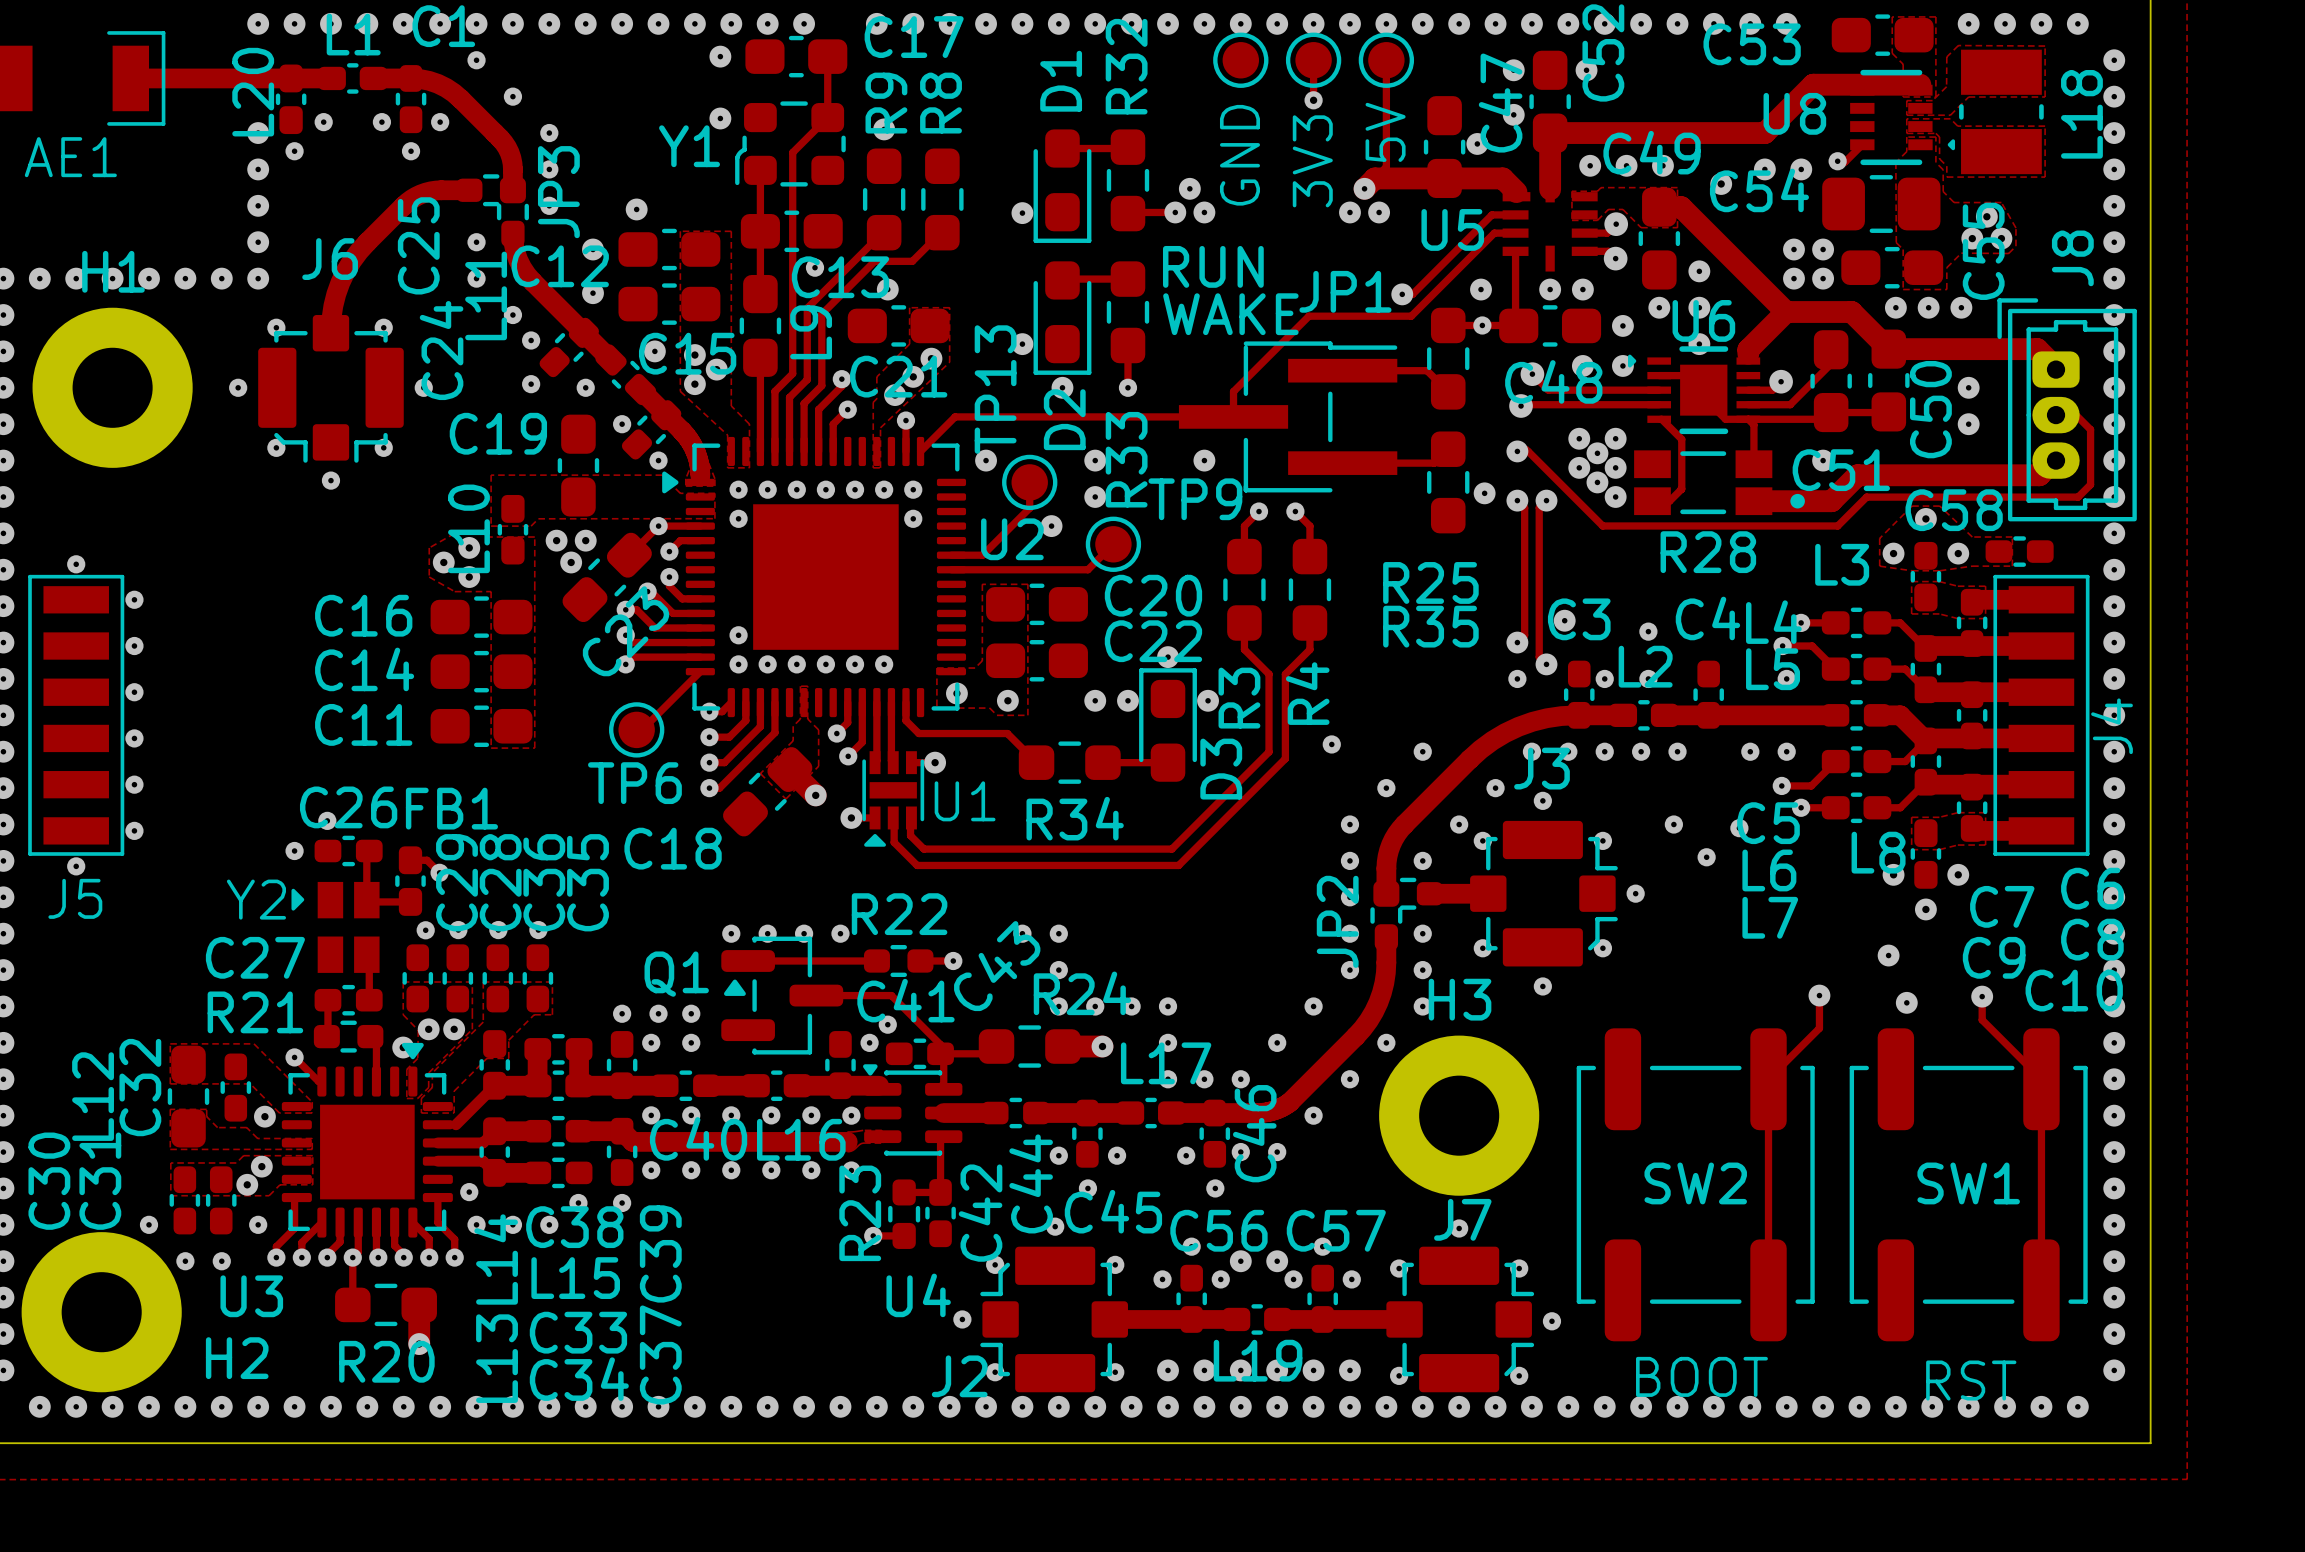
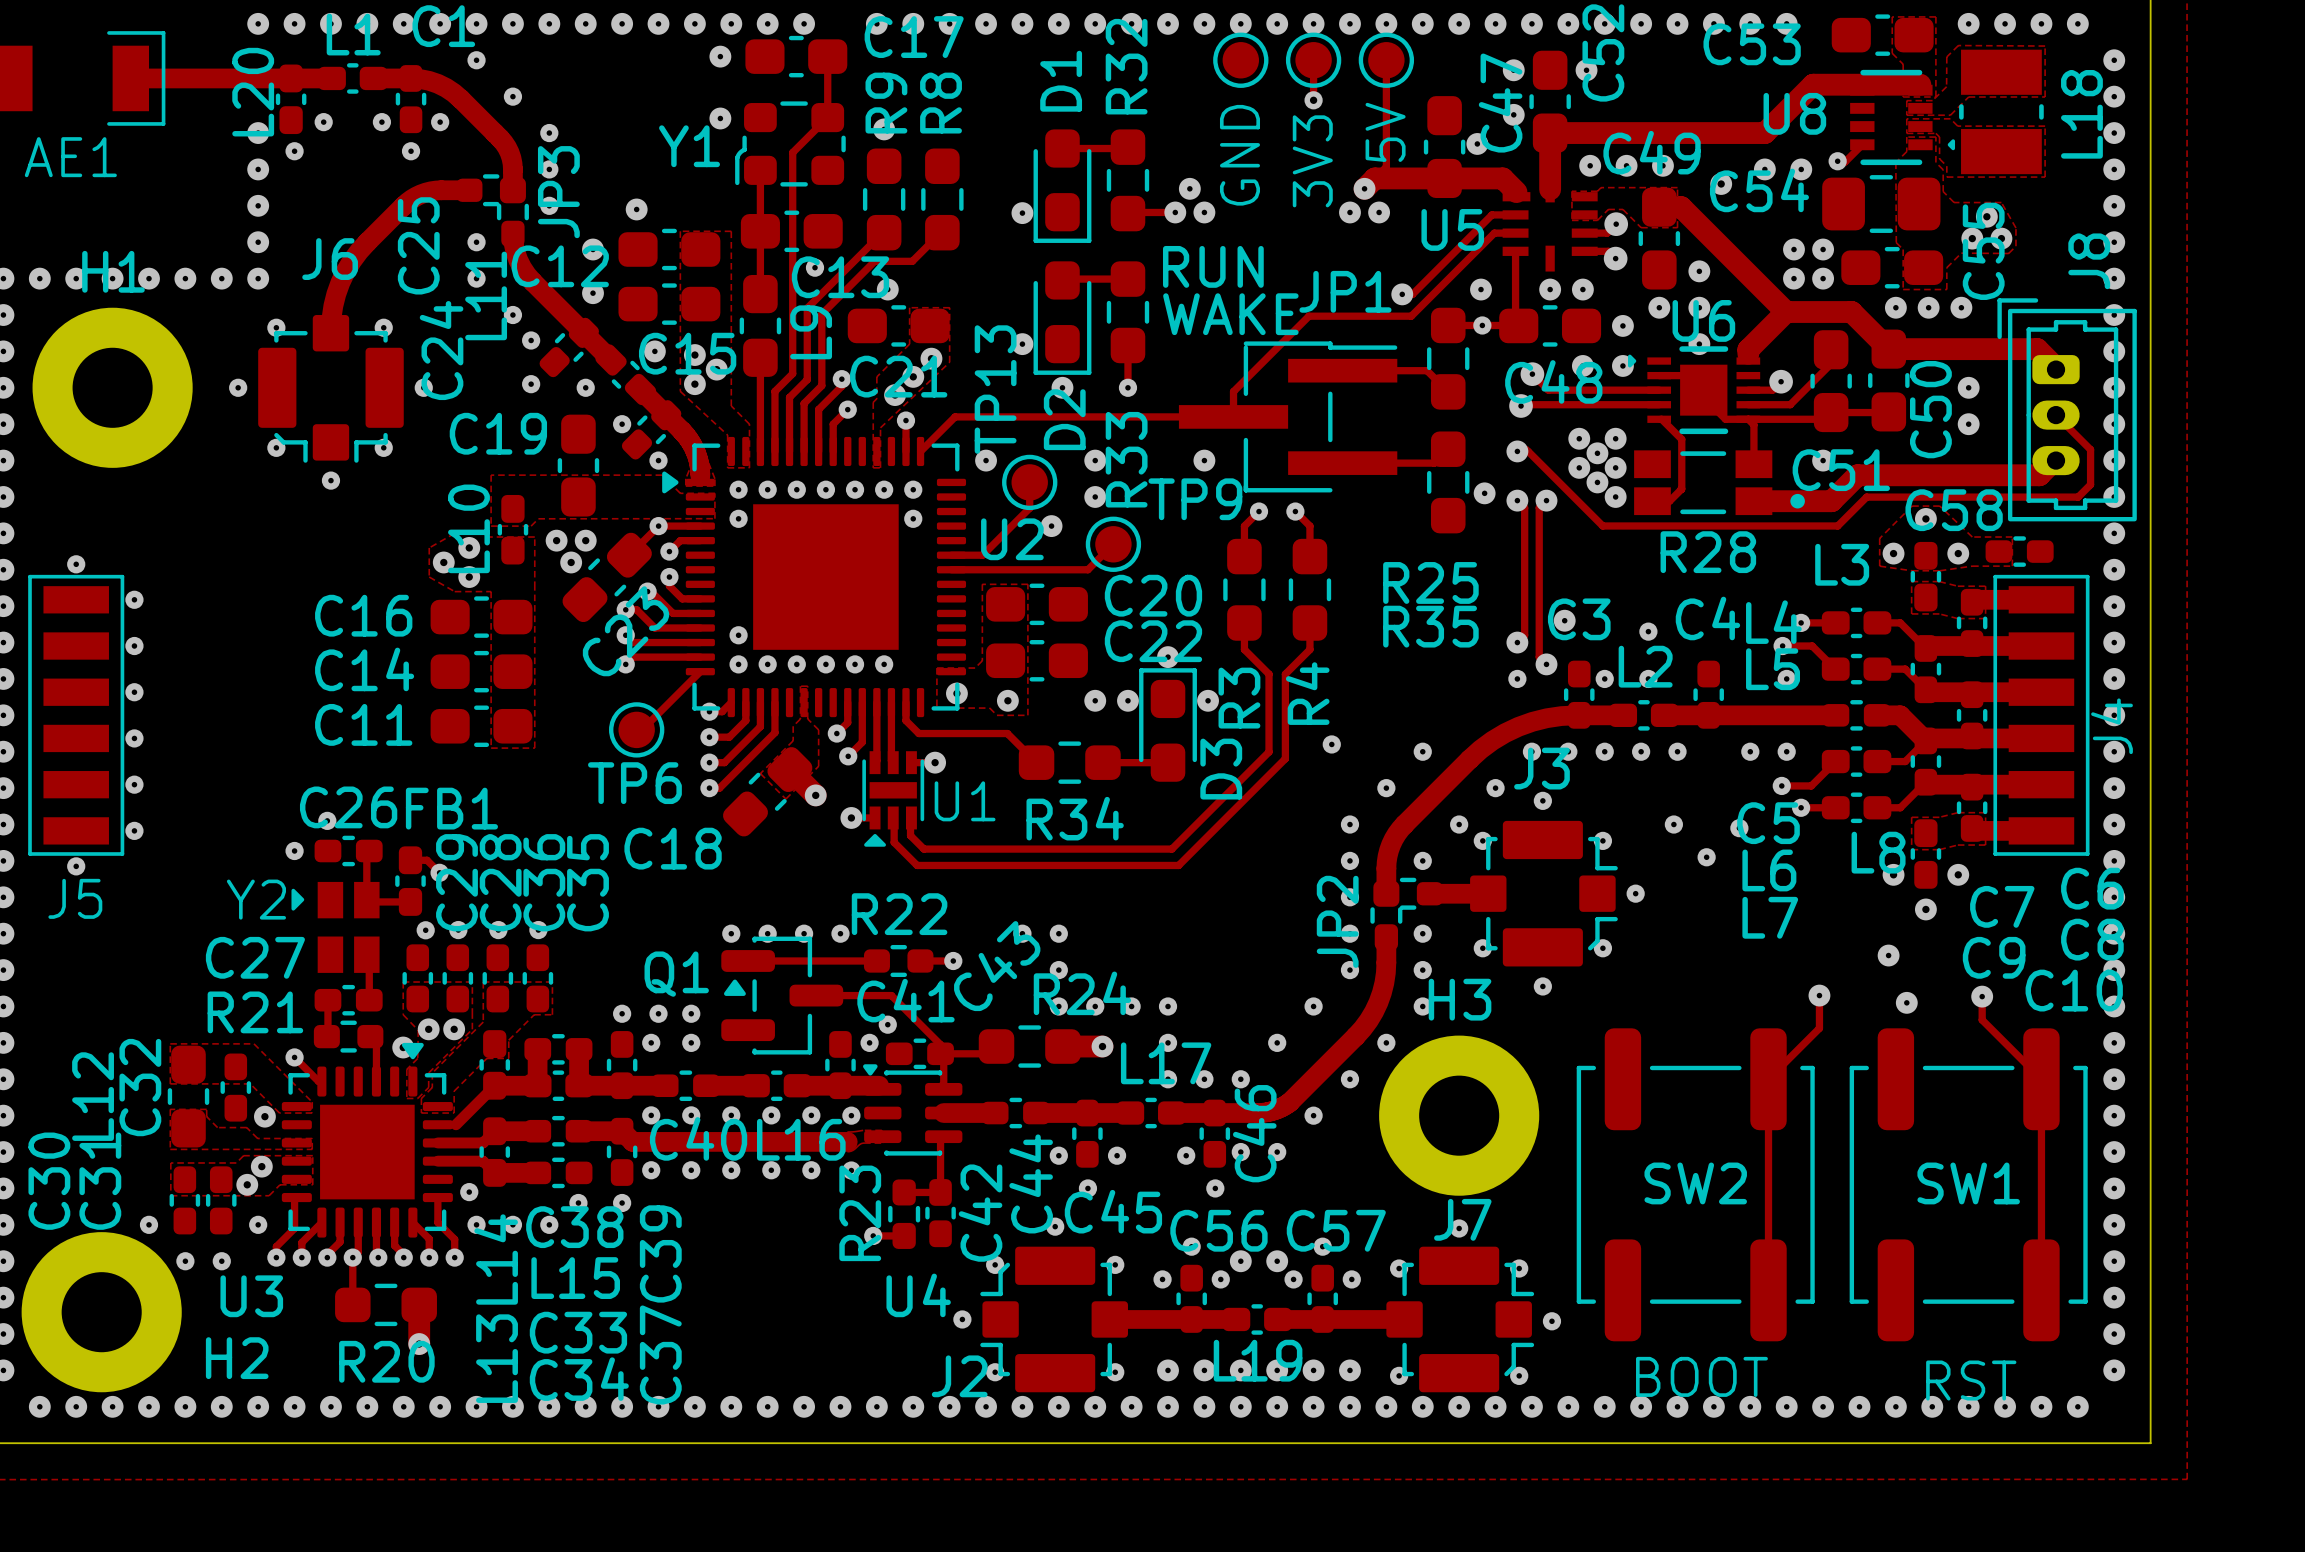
J8 name position: J8 (2072, 258) -> J8 (2089, 261)
J8 footprint: [1997, 298, 2137, 522] -> [1997, 298, 2137, 522]
track: (2056, 415) (2076, 415) (2090, 429) (2090, 449) -> (2056, 415) (2090, 449)

